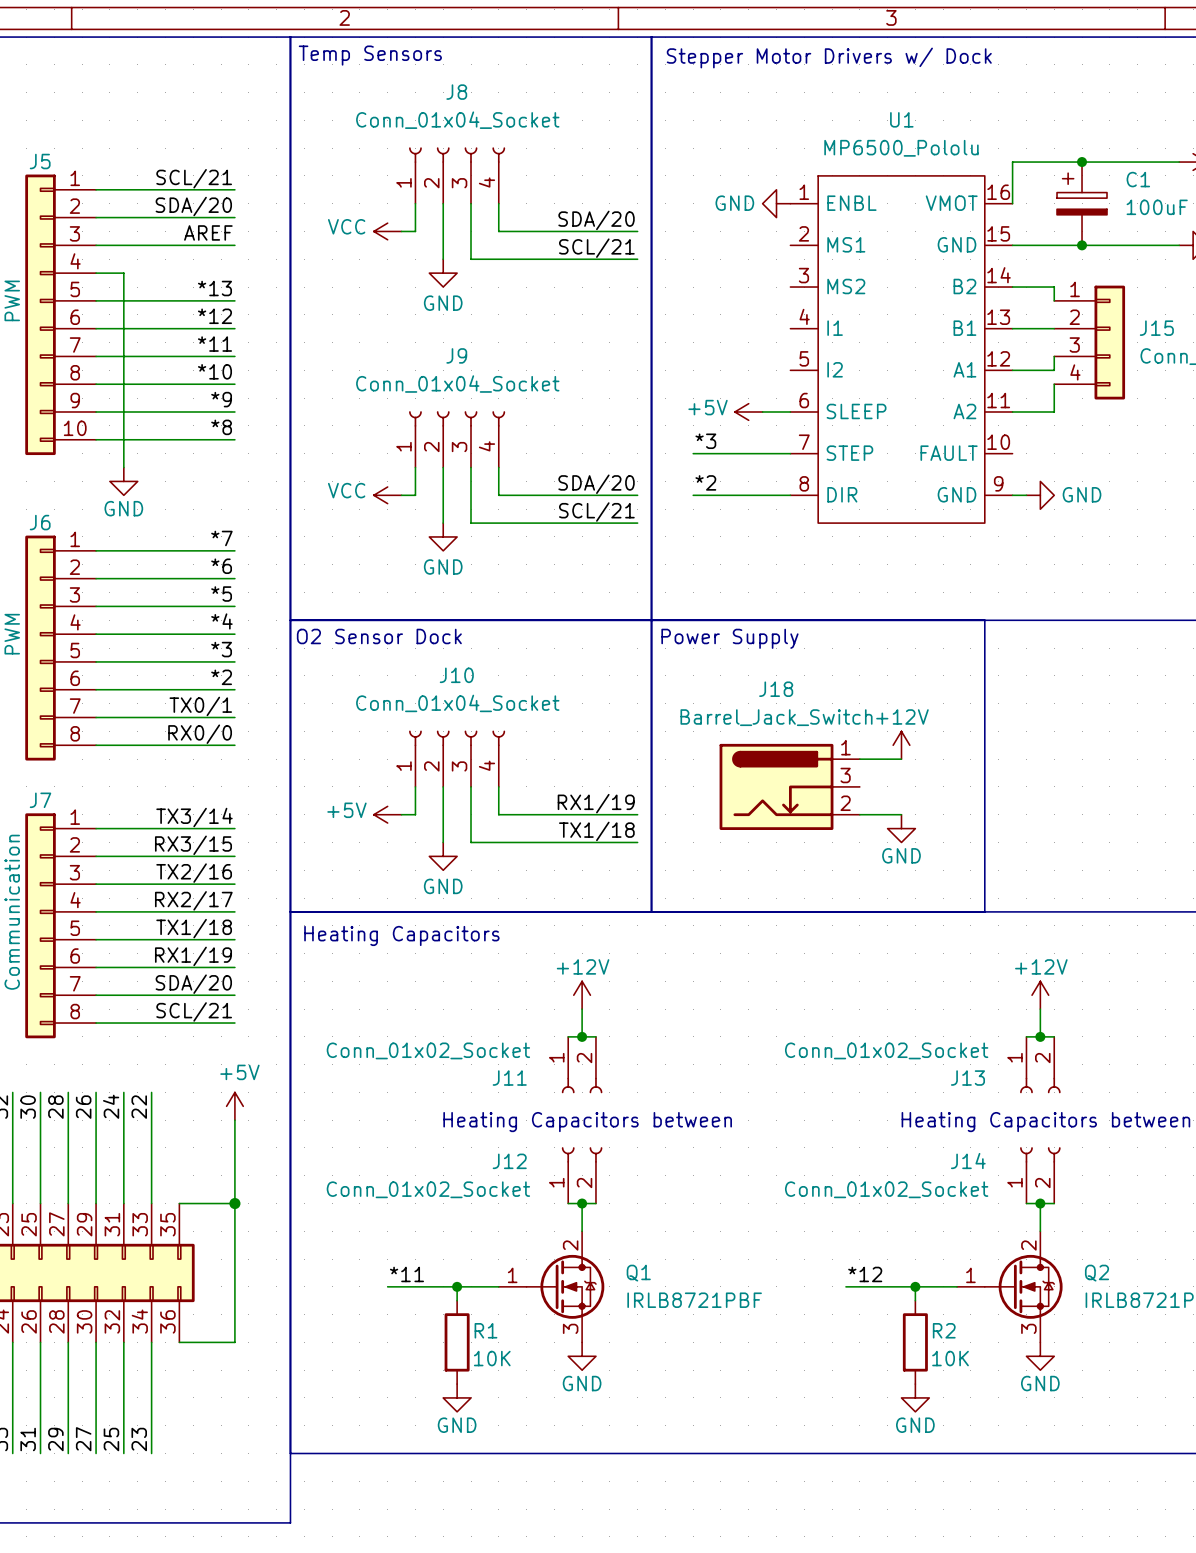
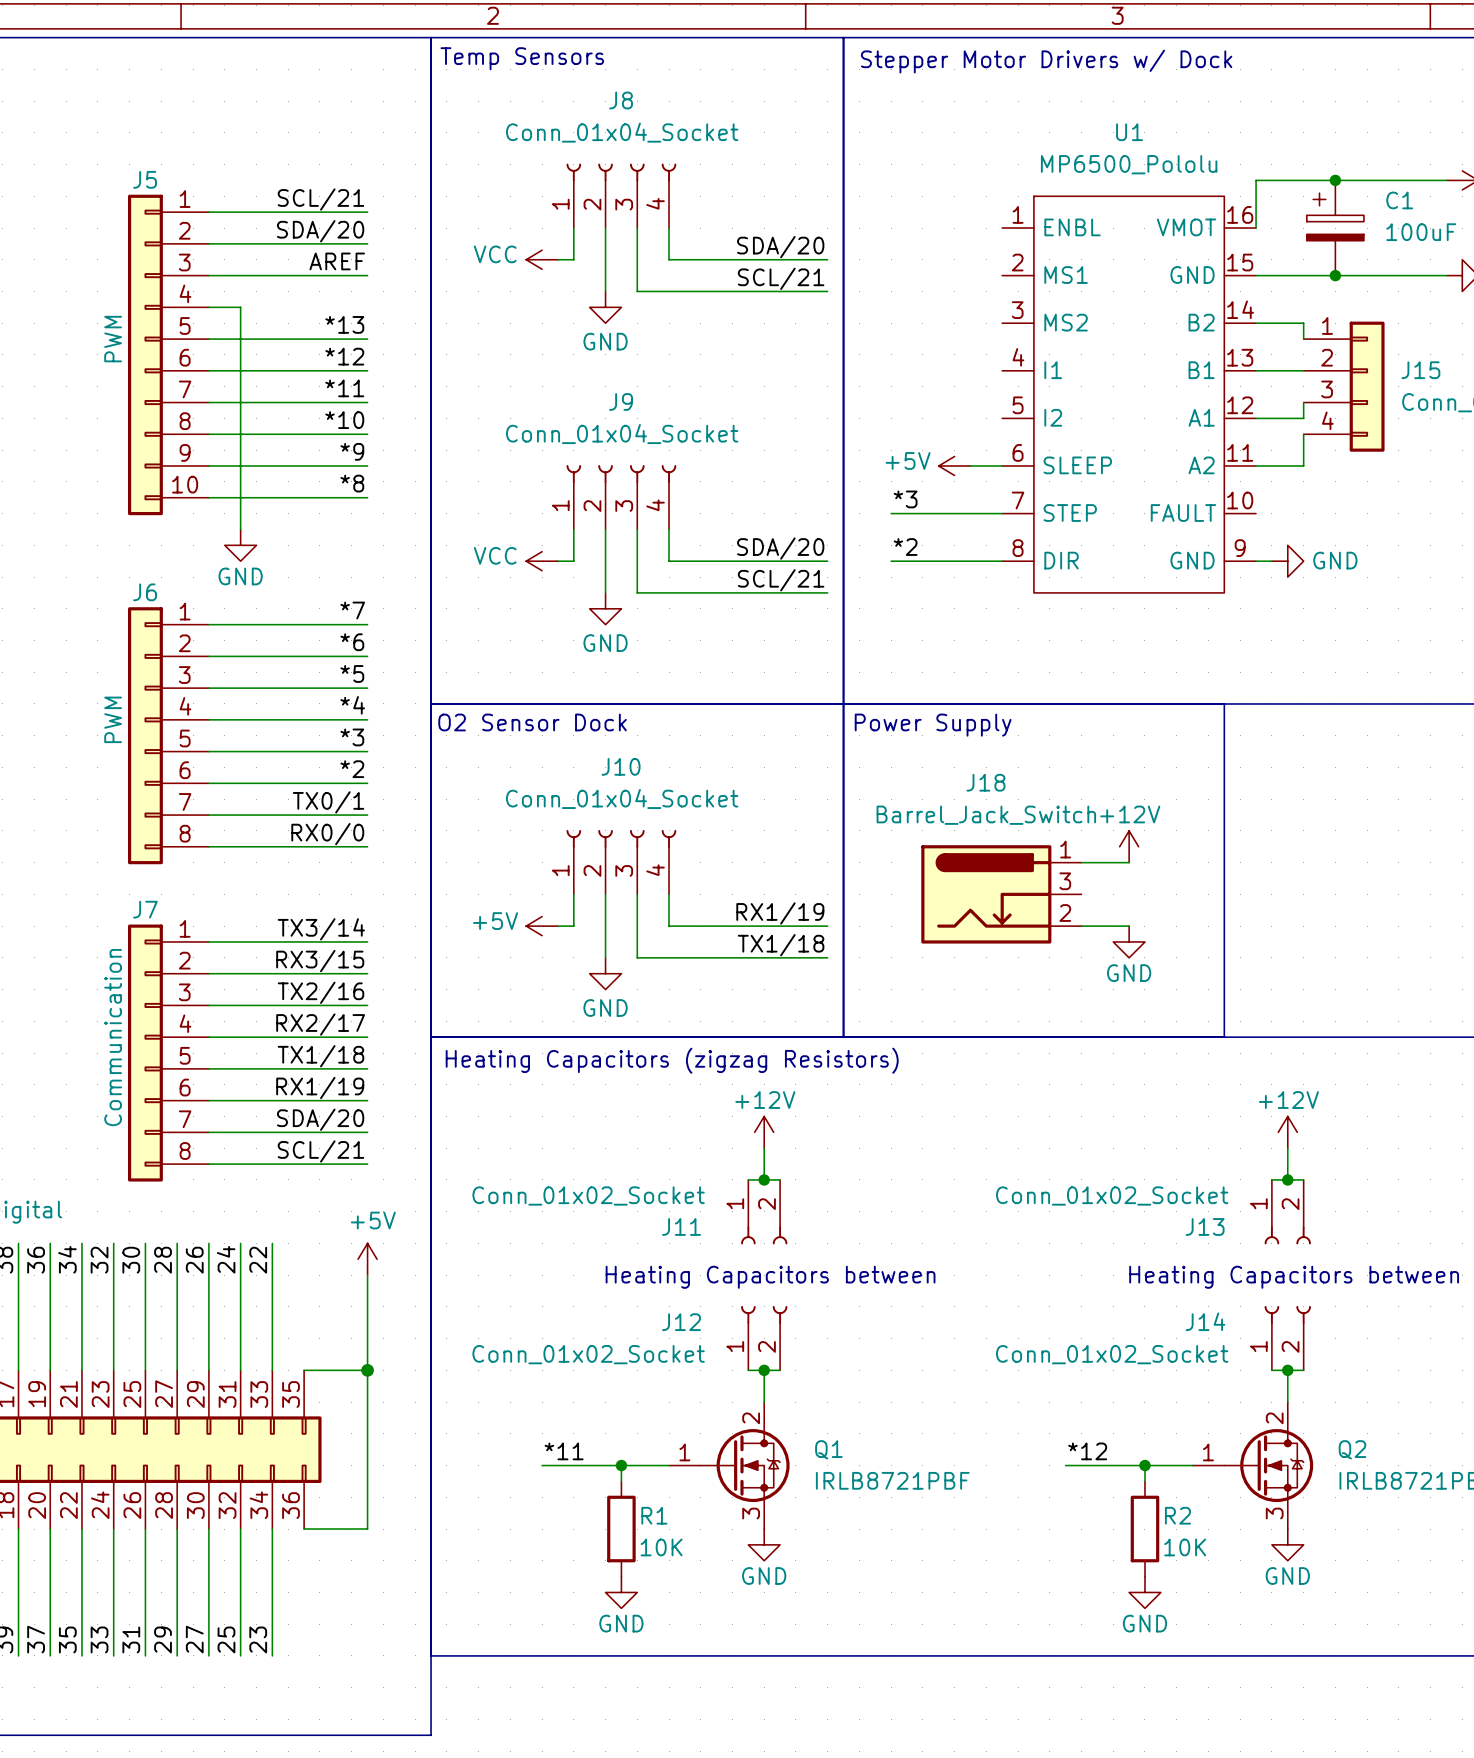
power symbol: GND (776, 203) -> none
text: Heating Capacitors (401, 935) -> Heating Capacitors (zigzag Resistors) (672, 1060)

